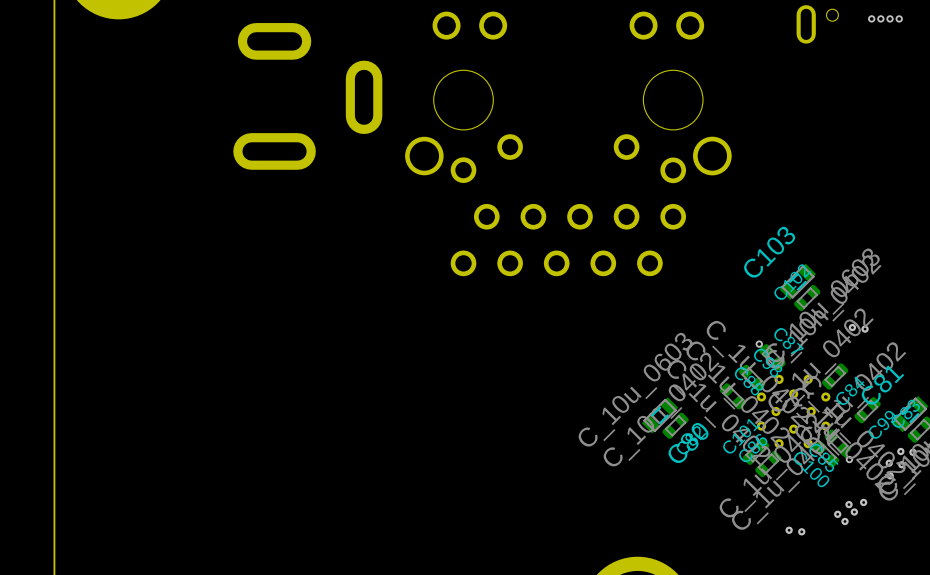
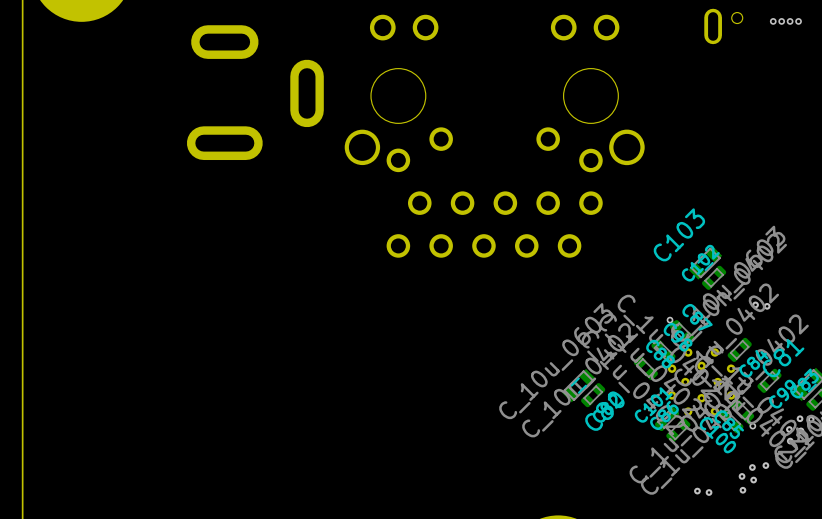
via: (854, 512) -> none
via: none -> (753, 480)
via: (845, 521) -> none
via: none -> (742, 490)

